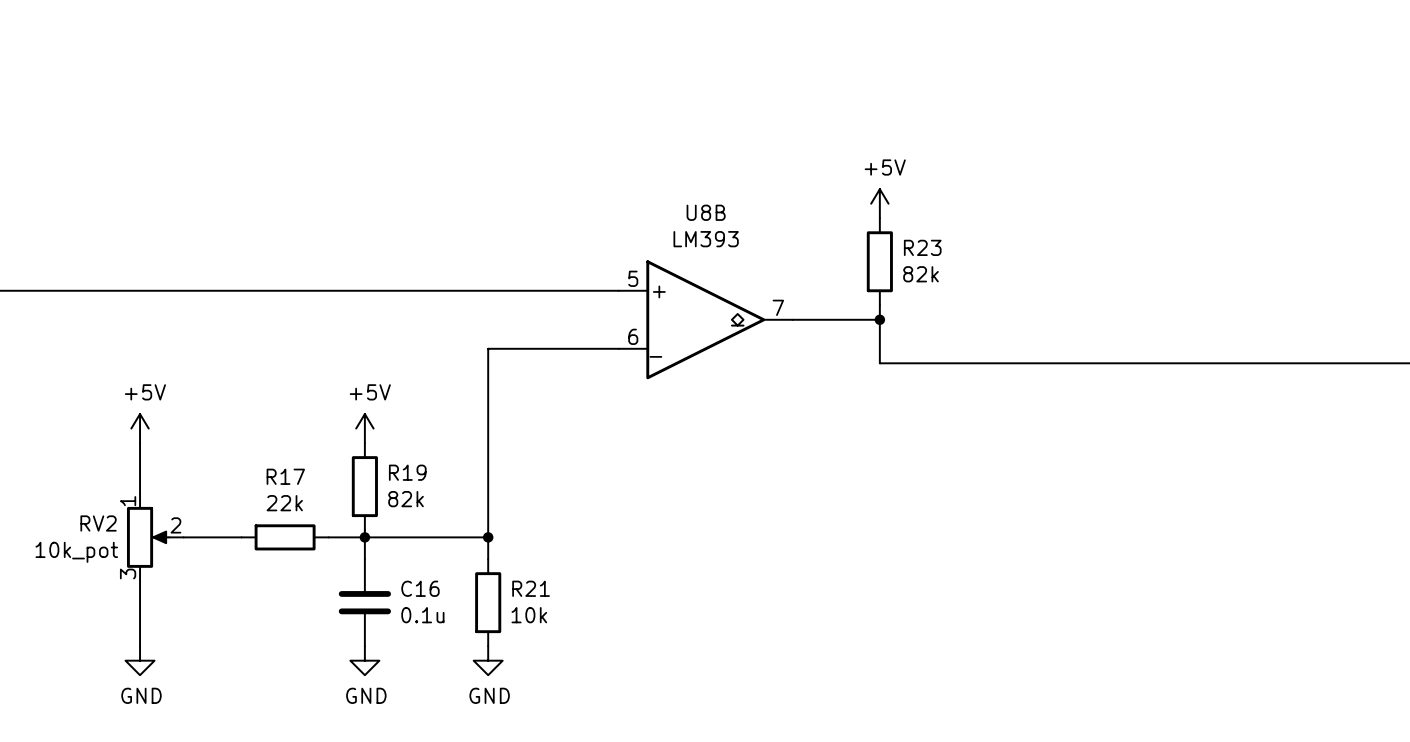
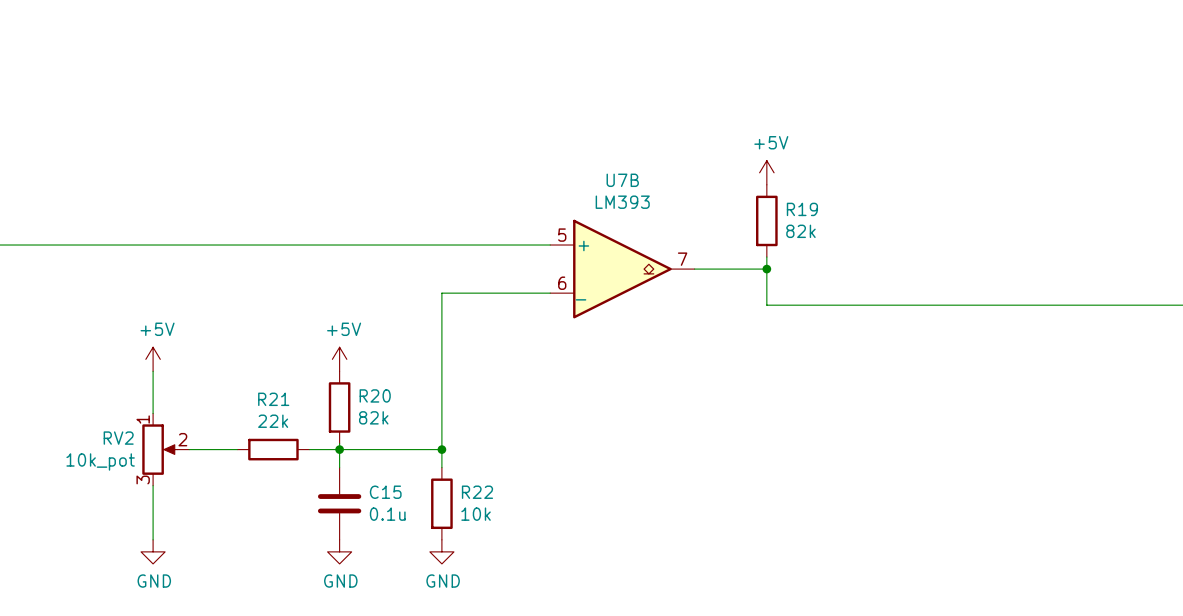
U8B name: U8B (706, 212) -> U7B (622, 180)
R23 name: R23 (922, 247) -> R19 (802, 209)
R19 name: R19 (407, 472) -> R20 (375, 395)
R17 name: R17 (285, 476) -> R21 (273, 399)
C16 name: C16 (420, 588) -> C15 (385, 492)
R21 name: R21 (531, 588) -> R22 (477, 492)

